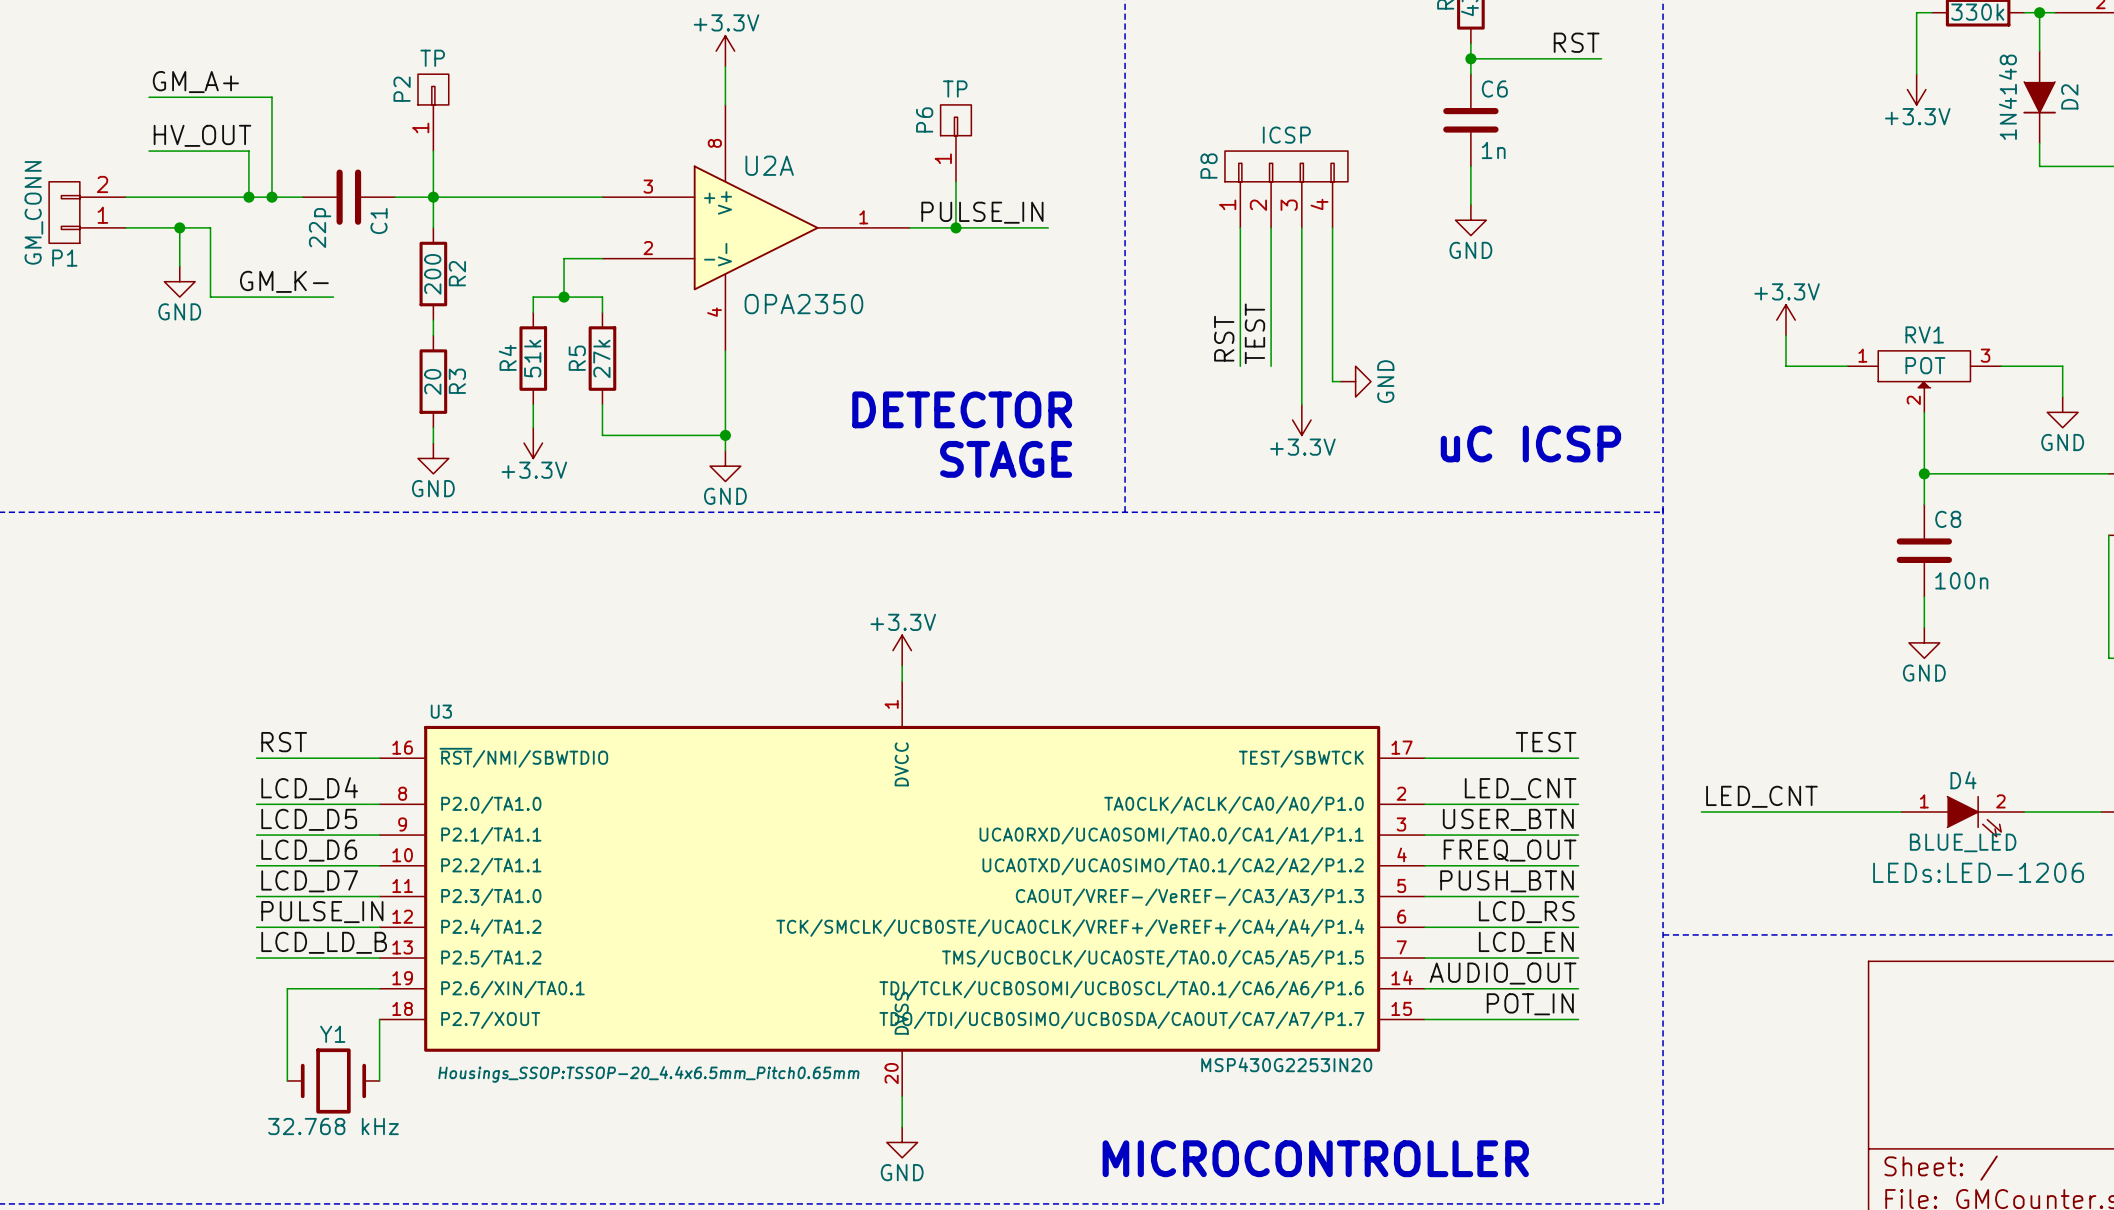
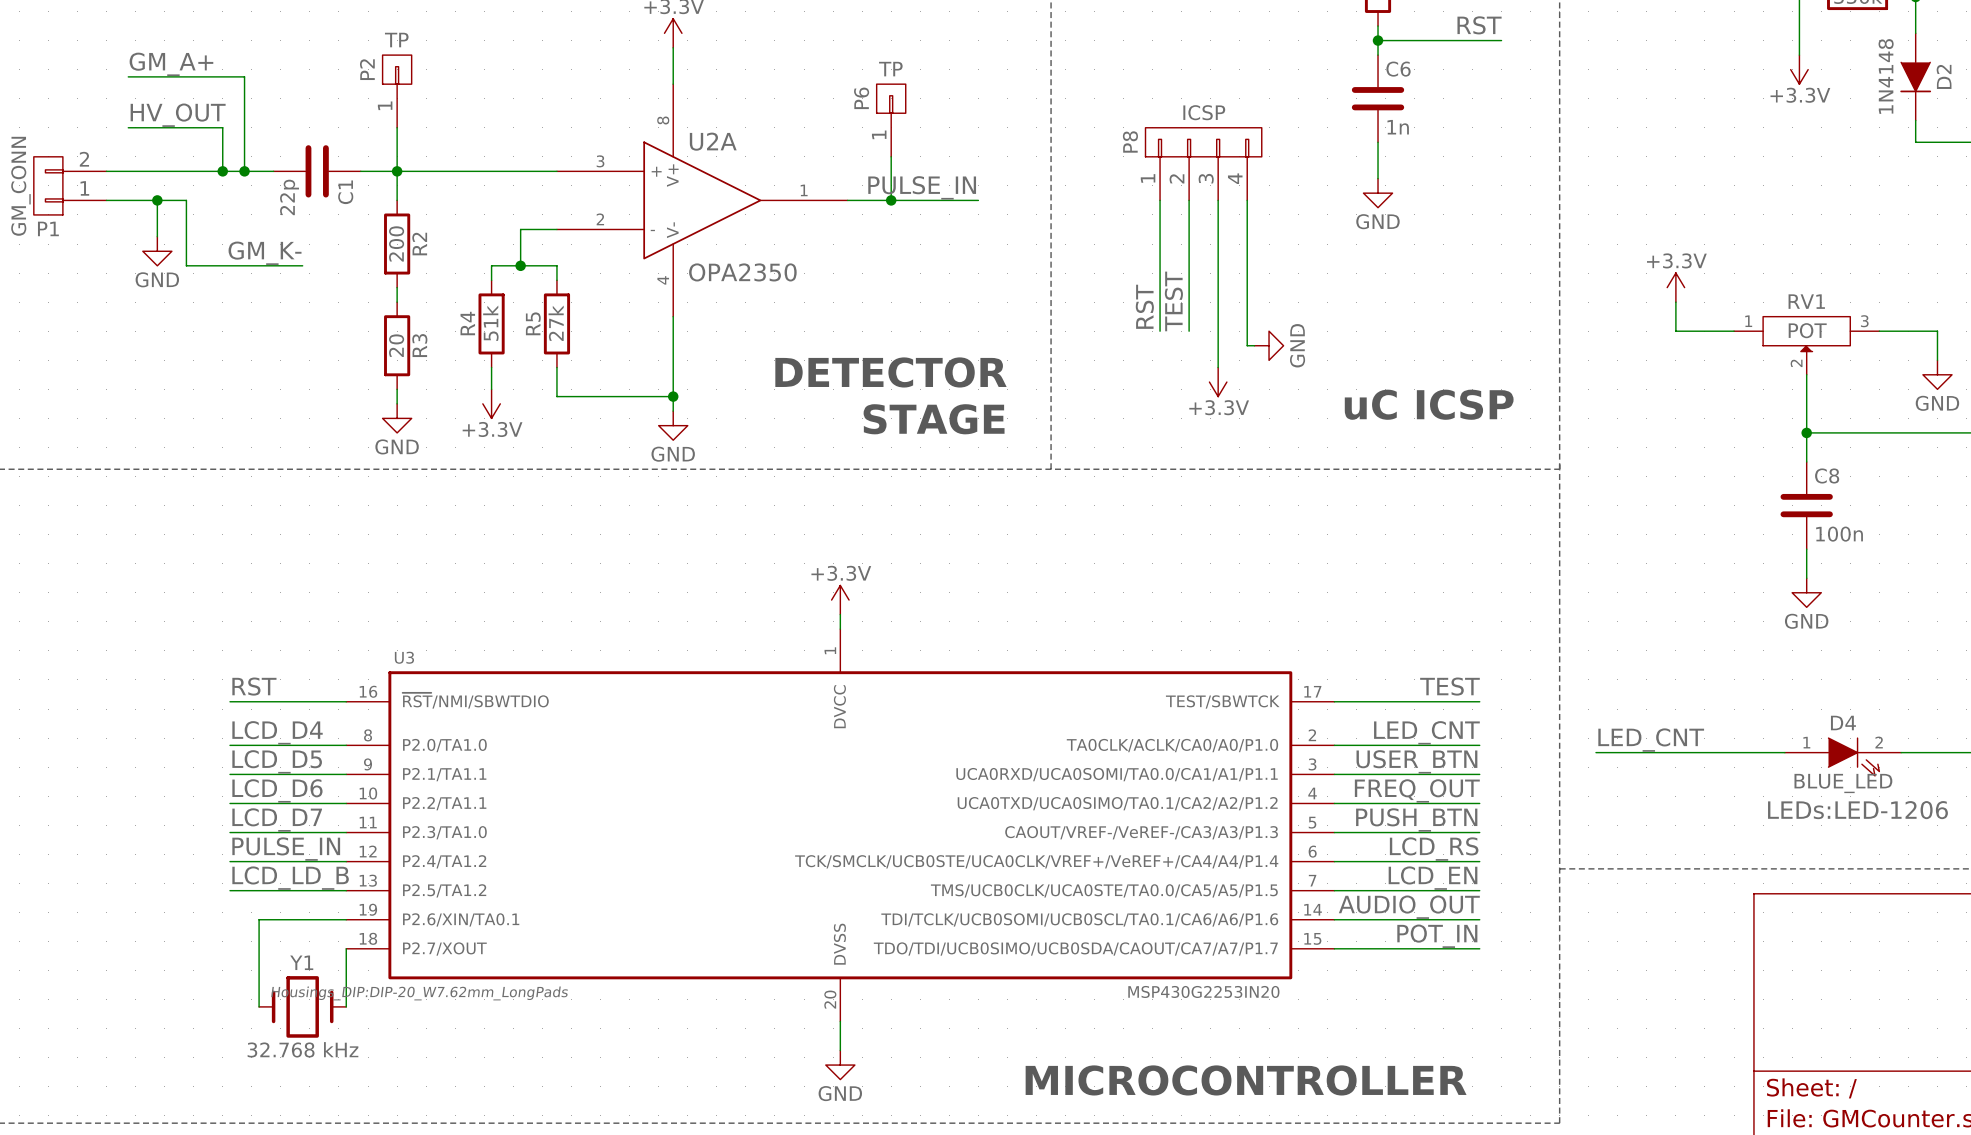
U3 text: Housings_SSOP:TSSOP-20_4.4x6.5mm_Pitch0.65mm (648, 1074) -> Housings_DIP:DIP-20_W7.62mm_LongPads (419, 993)

